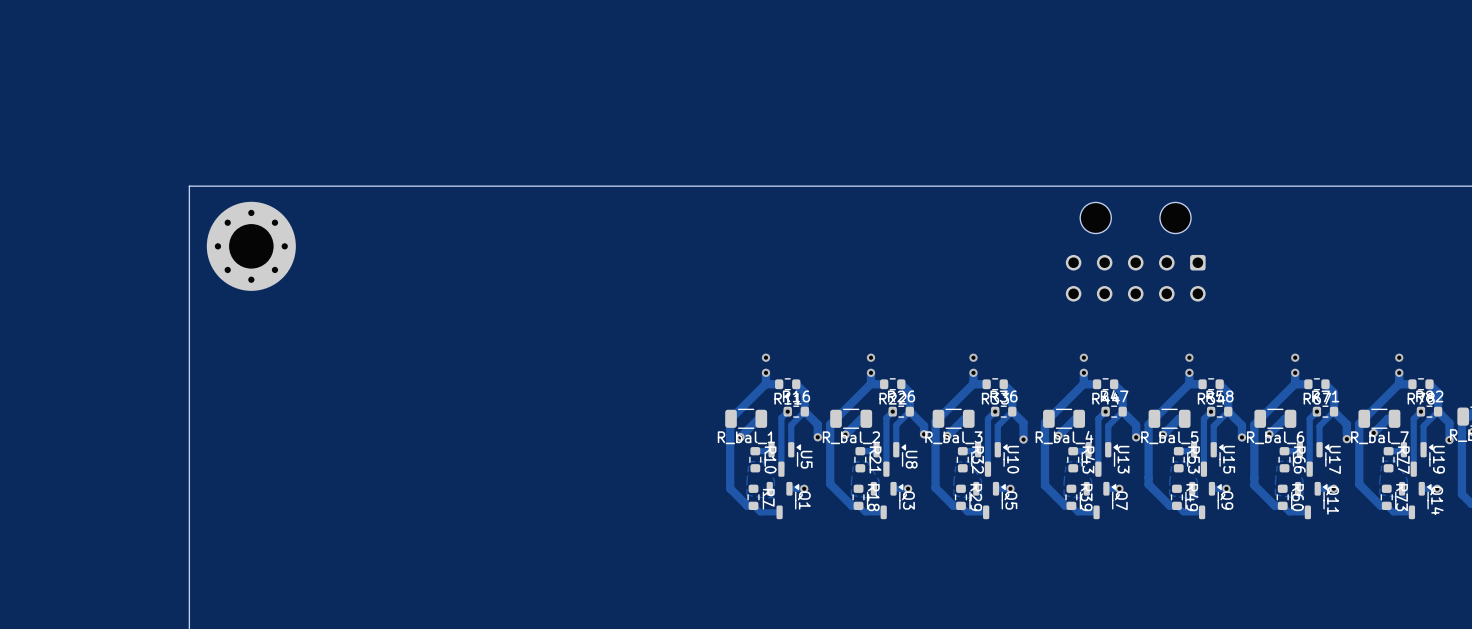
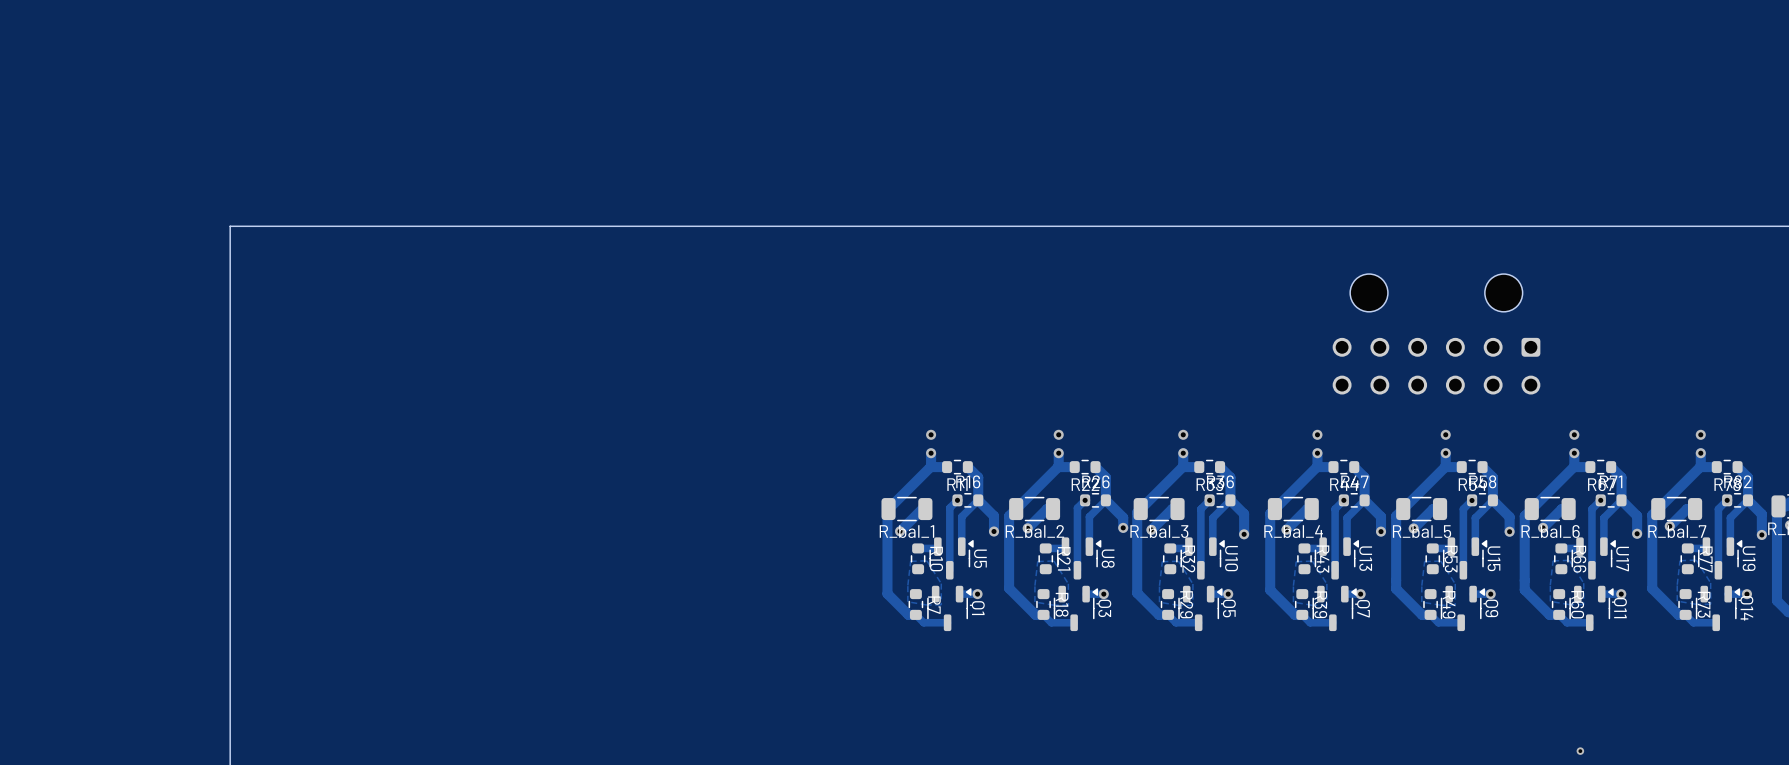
part: (251, 246) -> none
part: (1135, 252) -> none
part: none -> (1436, 334)
via: none -> (1580, 751)

